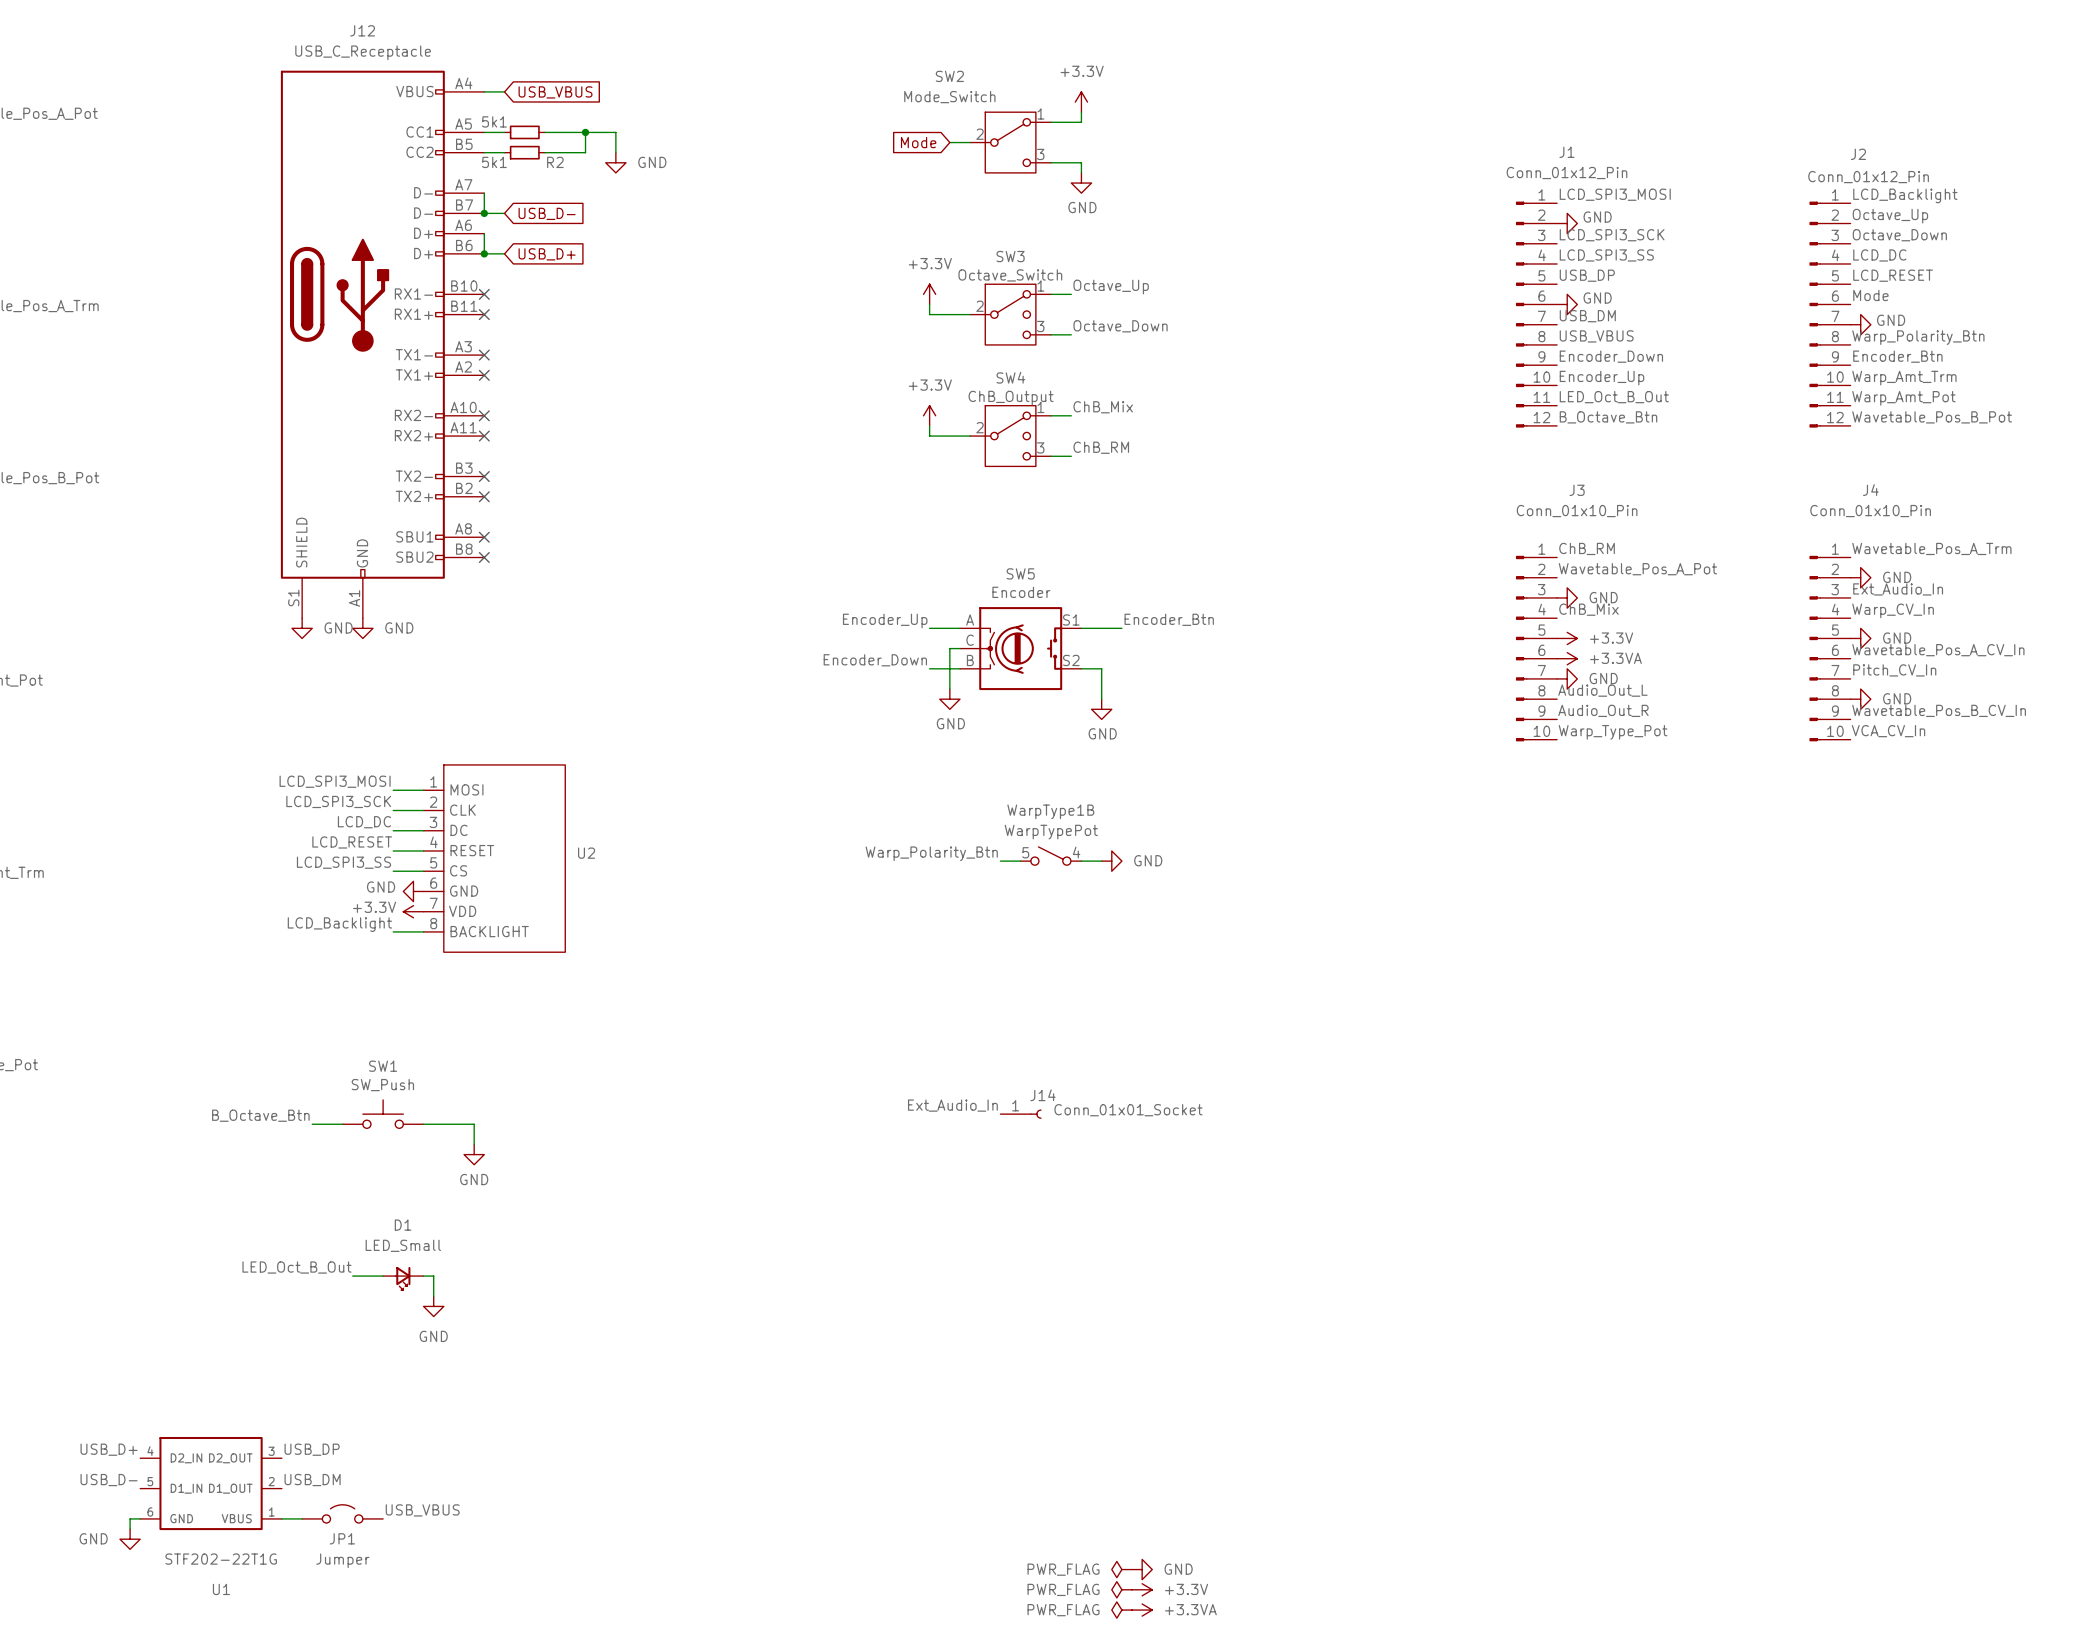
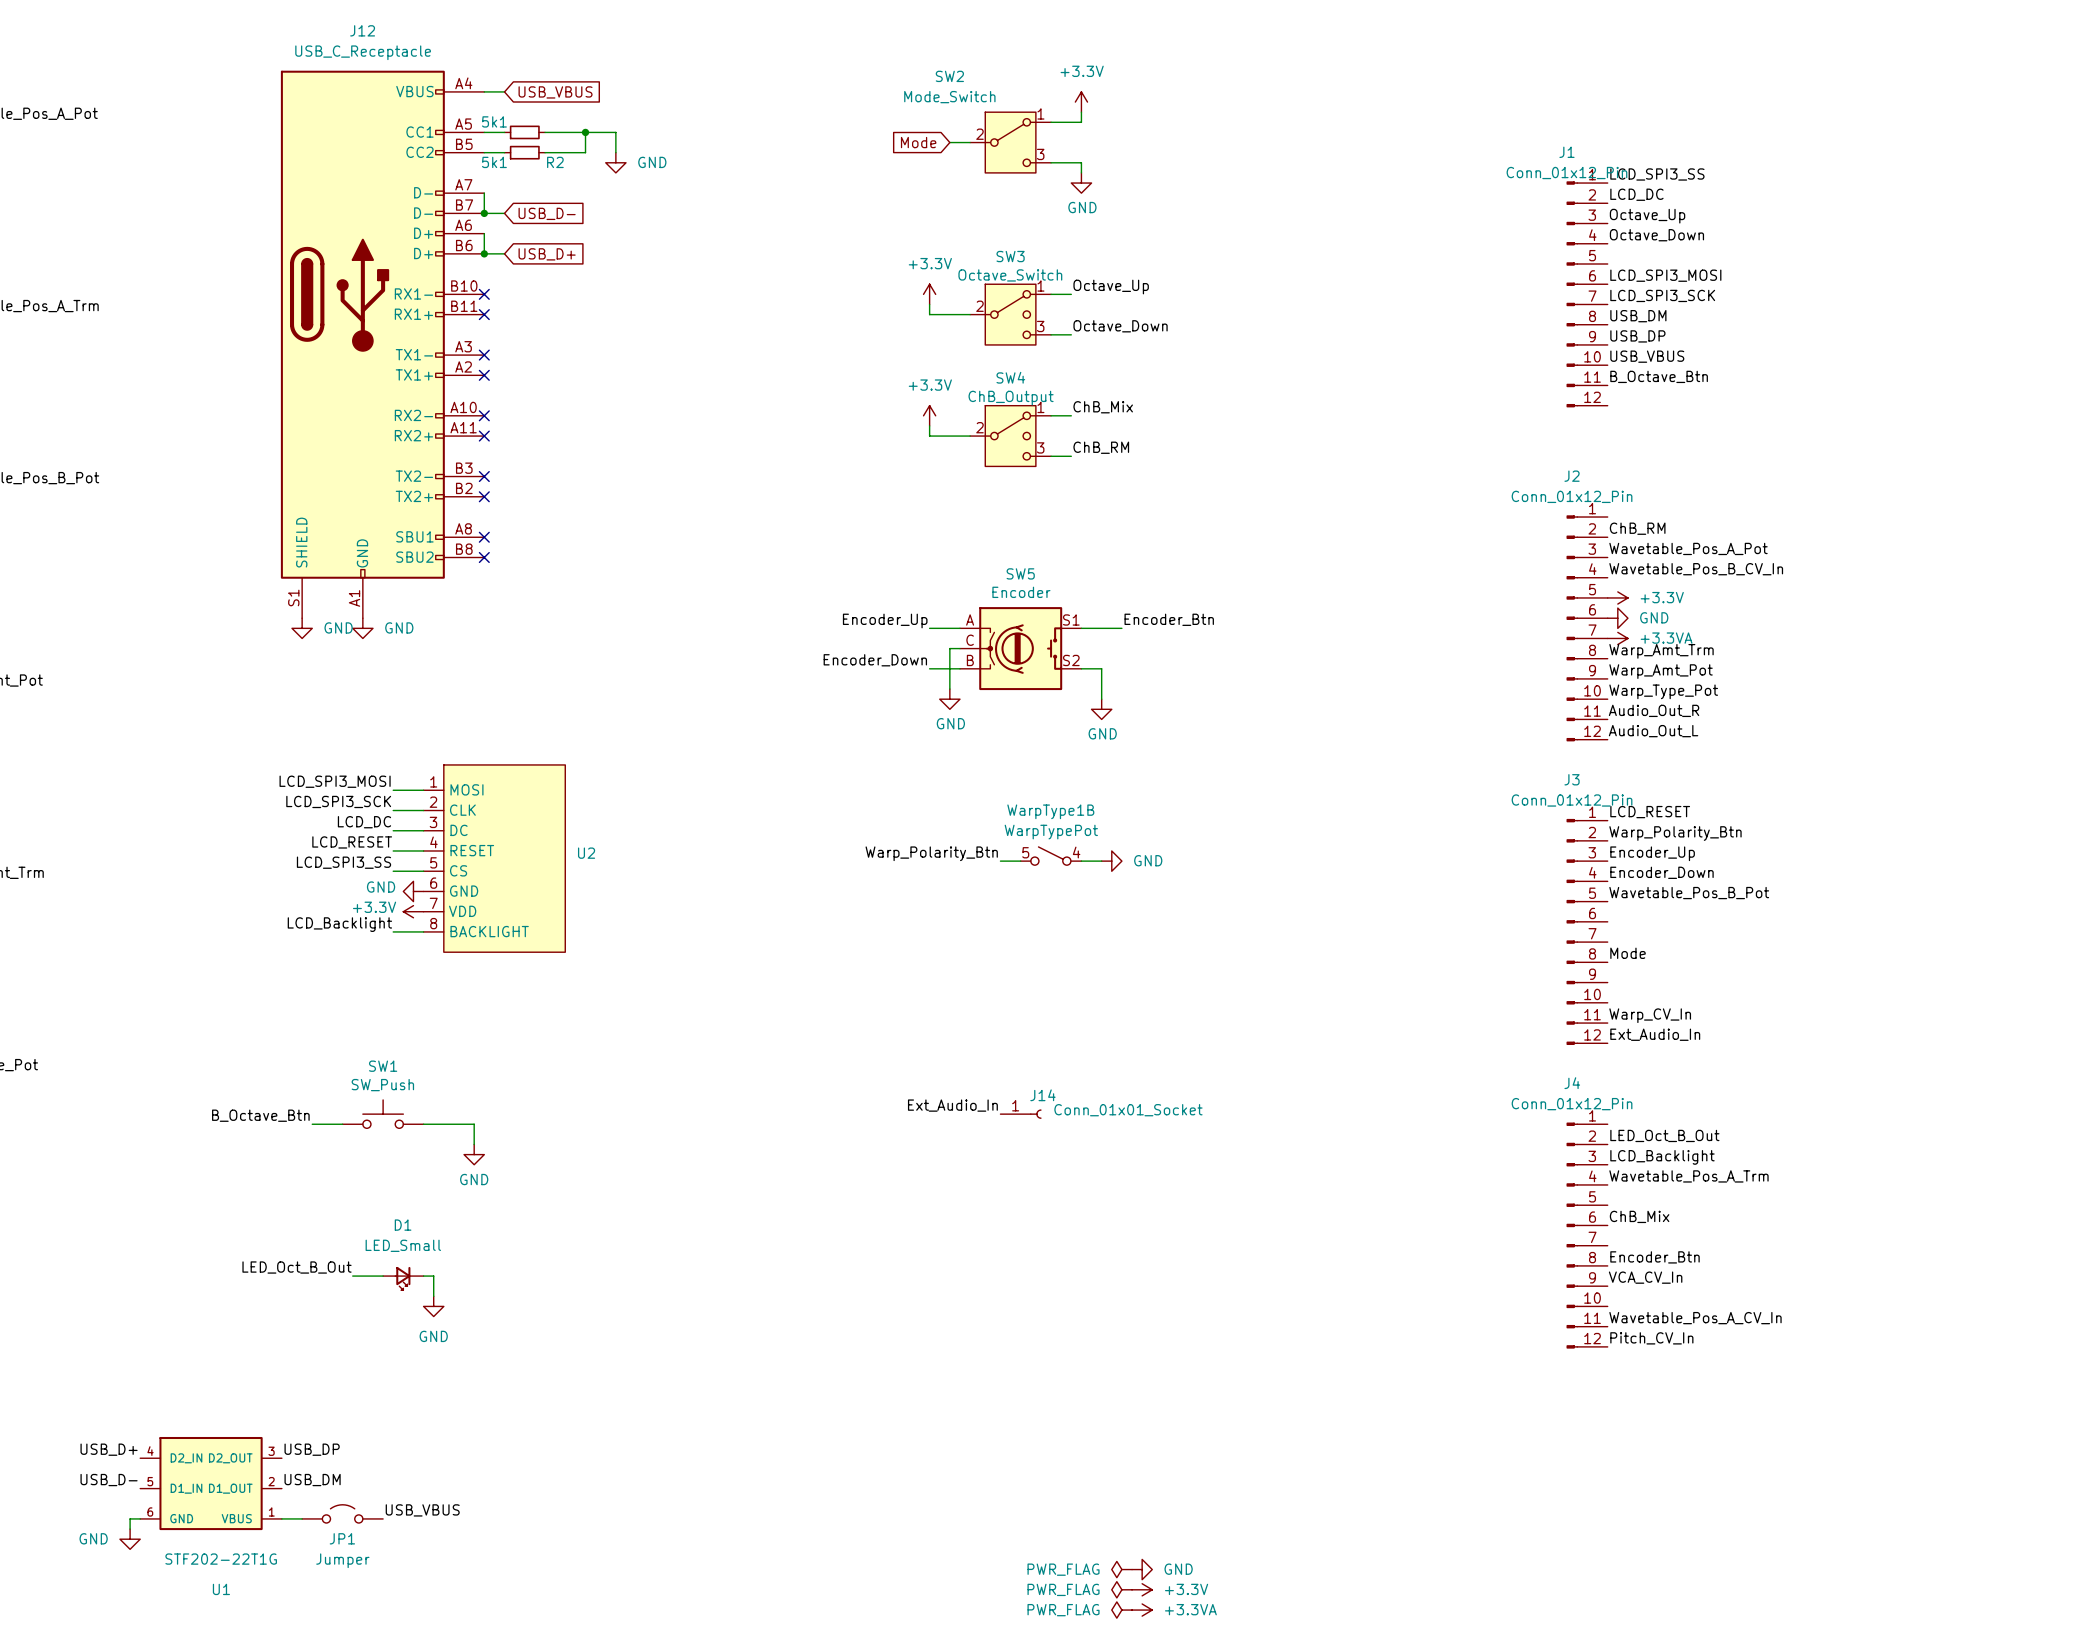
J2 name position: J2 (1858, 154) -> J2 (1572, 476)
J2 value position: Conn_01x12_Pin (1868, 177) -> Conn_01x12_Pin (1572, 496)
label position: LCD_SPI3_MOSI (1615, 194) -> LCD_SPI3_MOSI (1665, 275)
label: none -> LCD_DC (1636, 194)
label: LCD_Backlight (1905, 195) -> none
label: none -> Octave_Up (1647, 216)
label: Octave_Up (1890, 216) -> none
power symbol: GND (1567, 223) -> none
label position: LCD_SPI3_SCK (1612, 235) -> LCD_SPI3_SCK (1662, 295)
label: none -> Octave_Down (1656, 235)
label: Octave_Down (1899, 235) -> none
label position: LCD_SPI3_SS (1606, 255) -> LCD_SPI3_SS (1657, 174)
label: LCD_DC (1879, 255) -> none
label position: USB_DP (1587, 275) -> USB_DP (1637, 336)
label: LCD_RESET (1893, 275) -> none
label: Mode (1870, 295) -> none
power symbol: GND (1567, 304) -> none
J1 position: (1536, 314) -> (1587, 294)
J2 position: (1830, 314) -> (1587, 628)
label position: USB_DM (1587, 316) -> USB_DM (1638, 316)
power symbol: GND (1860, 324) -> none
label position: USB_VBUS (1596, 336) -> USB_VBUS (1647, 356)
label: Warp_Polarity_Btn (1918, 337) -> none
label: Encoder_Down (1611, 356) -> none
label: Encoder_Btn (1897, 356) -> none
label: Encoder_Up (1601, 378) -> none
label: Warp_Amt_Trm (1904, 378) -> none
label: LED_Oct_B_Out (1614, 397) -> none
label: Warp_Amt_Pot (1903, 398) -> none
label position: B_Octave_Btn (1608, 417) -> B_Octave_Btn (1659, 376)
label: Wavetable_Pos_B_Pot (1932, 417) -> none
J3 name position: J3 (1577, 490) -> J3 (1572, 779)
J4 name position: J4 (1870, 490) -> J4 (1572, 1083)
J3 value: Conn_01x10_Pin (1577, 511) -> Conn_01x12_Pin (1572, 800)
J4 value: Conn_01x10_Pin (1870, 511) -> Conn_01x12_Pin (1572, 1104)
label position: ChB_RM (1587, 548) -> ChB_RM (1637, 528)
label: Wavetable_Pos_A_Trm (1931, 548) -> none
J3 symbol: [1516, 555, 1558, 742] -> [1566, 819, 1608, 1045]
J4 symbol: [1809, 555, 1851, 742] -> [1566, 1122, 1608, 1349]
label position: Wavetable_Pos_A_Pot (1637, 569) -> Wavetable_Pos_A_Pot (1688, 548)
label: none -> Wavetable_Pos_B_CV_In (1696, 569)
power symbol: GND (1860, 577) -> none
label: Ext_Audio_In (1898, 589) -> none
power symbol: GND (1567, 597) -> none
label: ChB_Mix (1588, 609) -> none
label: Warp_CV_In (1893, 610) -> none
power symbol: none -> GND (1617, 618)
power symbol position: +3.3V (1567, 638) -> +3.3V (1617, 597)
power symbol: GND (1860, 638) -> none
label: Wavetable_Pos_A_CV_In (1938, 650) -> none
label: none -> Warp_Amt_Trm (1661, 651)
power symbol position: +3.3VA (1567, 658) -> +3.3VA (1617, 638)
label: Pitch_CV_In (1894, 670) -> none
label: none -> Warp_Amt_Pot (1661, 671)
power symbol: GND (1567, 678) -> none
label position: Audio_Out_L (1602, 690) -> Audio_Out_L (1653, 731)
power symbol: GND (1860, 699) -> none
label position: Audio_Out_R (1603, 710) -> Audio_Out_R (1654, 710)
label: Wavetable_Pos_B_CV_In (1939, 710) -> none
label: VCA_CV_In (1888, 731) -> none
label position: Warp_Type_Pot (1613, 732) -> Warp_Type_Pot (1663, 691)
label: none -> LCD_RESET (1650, 812)
label: none -> Warp_Polarity_Btn (1675, 833)
label: none -> Encoder_Up (1652, 853)
label: none -> Encoder_Down (1661, 872)
label: none -> Wavetable_Pos_B_Pot (1689, 893)
label: none -> Mode (1628, 953)
label: none -> Warp_CV_In (1650, 1015)
label: none -> Ext_Audio_In (1655, 1034)
label: none -> LED_Oct_B_Out (1664, 1135)
label: none -> LCD_Backlight (1662, 1157)
label: none -> Wavetable_Pos_A_Trm (1688, 1176)
label: none -> ChB_Mix (1639, 1216)
label: none -> Encoder_Btn (1655, 1257)
label: none -> VCA_CV_In (1645, 1277)
label: none -> Wavetable_Pos_A_CV_In (1695, 1318)
label: none -> Pitch_CV_In (1651, 1338)

